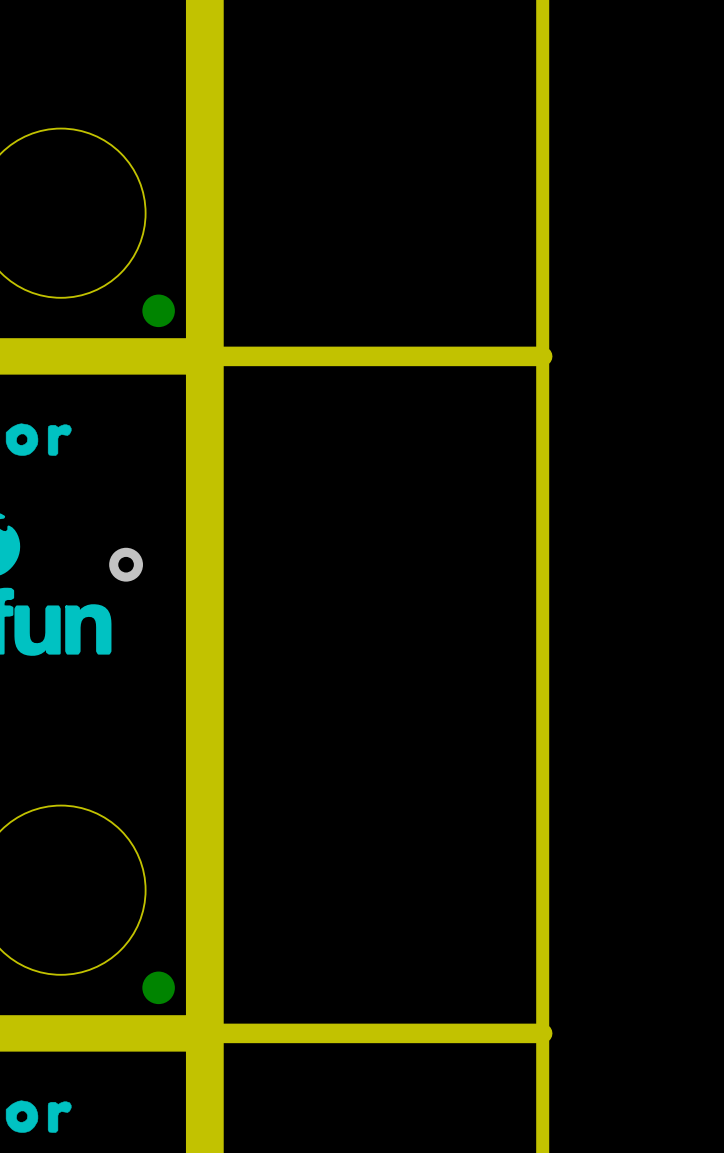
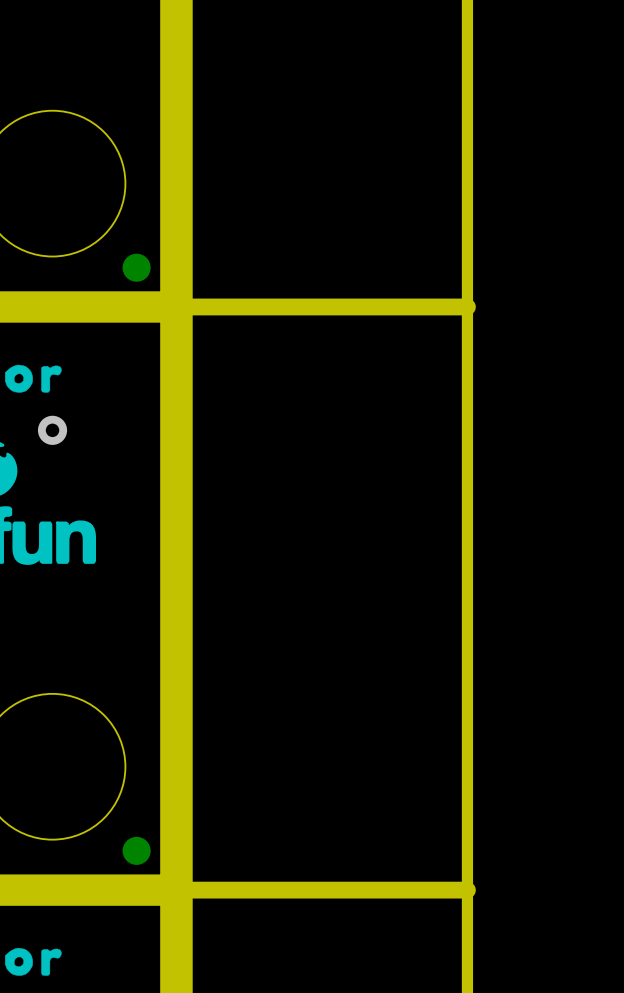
via: none -> (52, 430)
via: (126, 564) -> none

